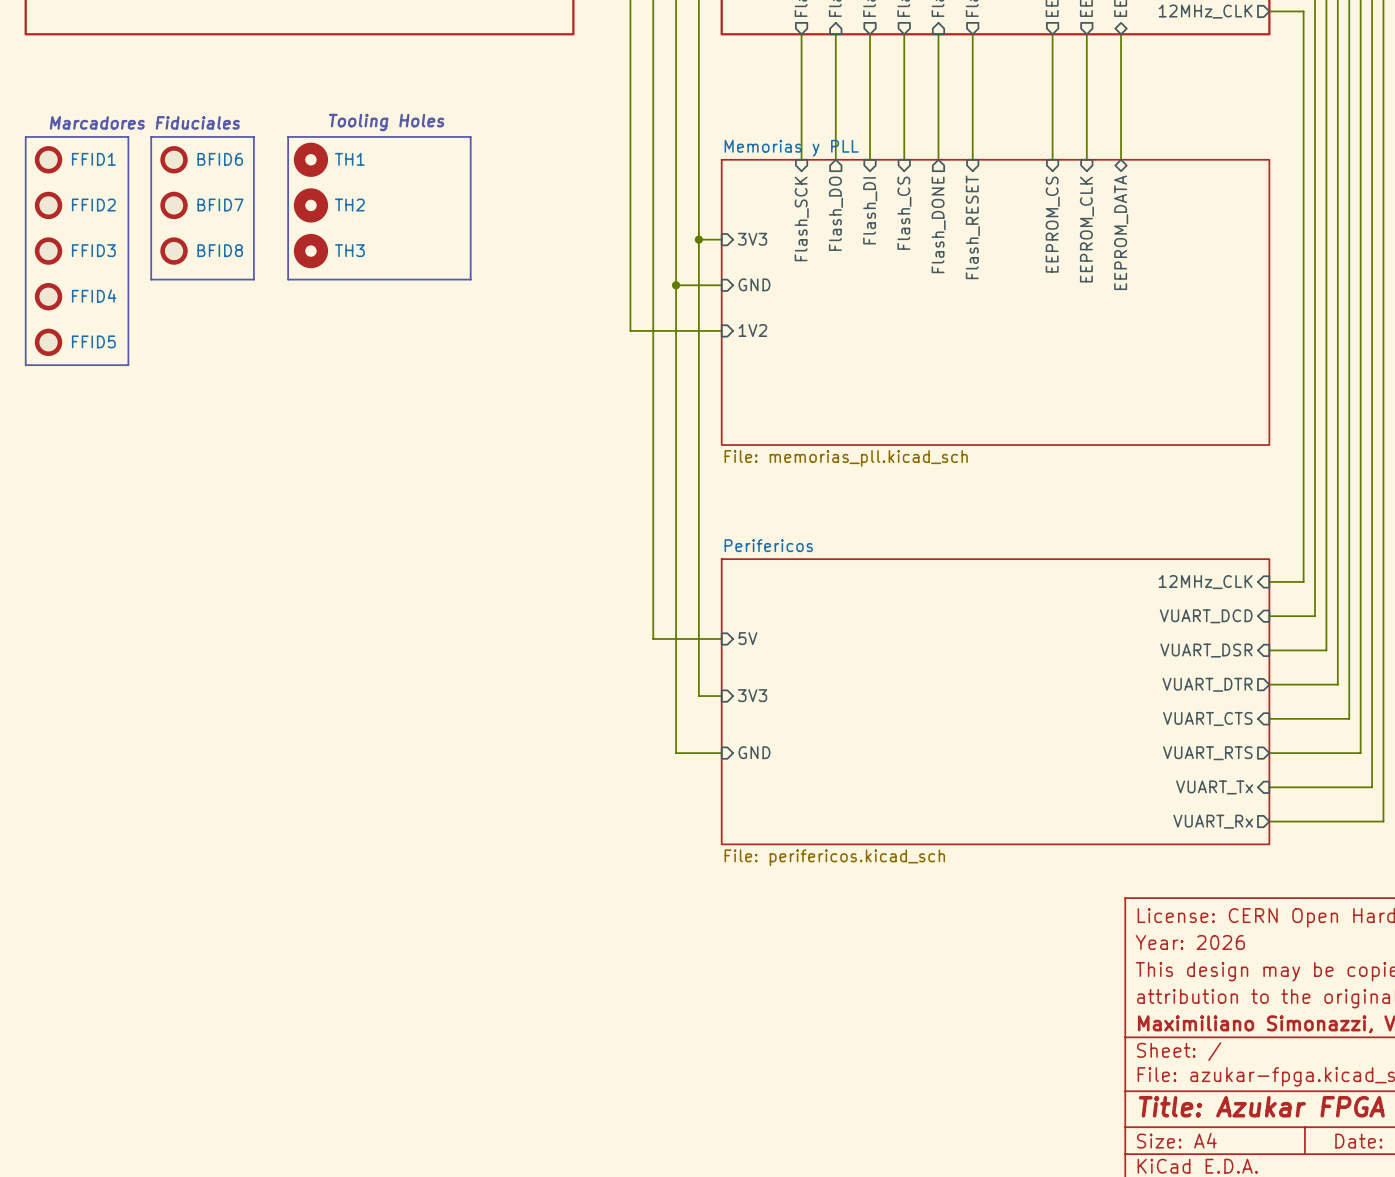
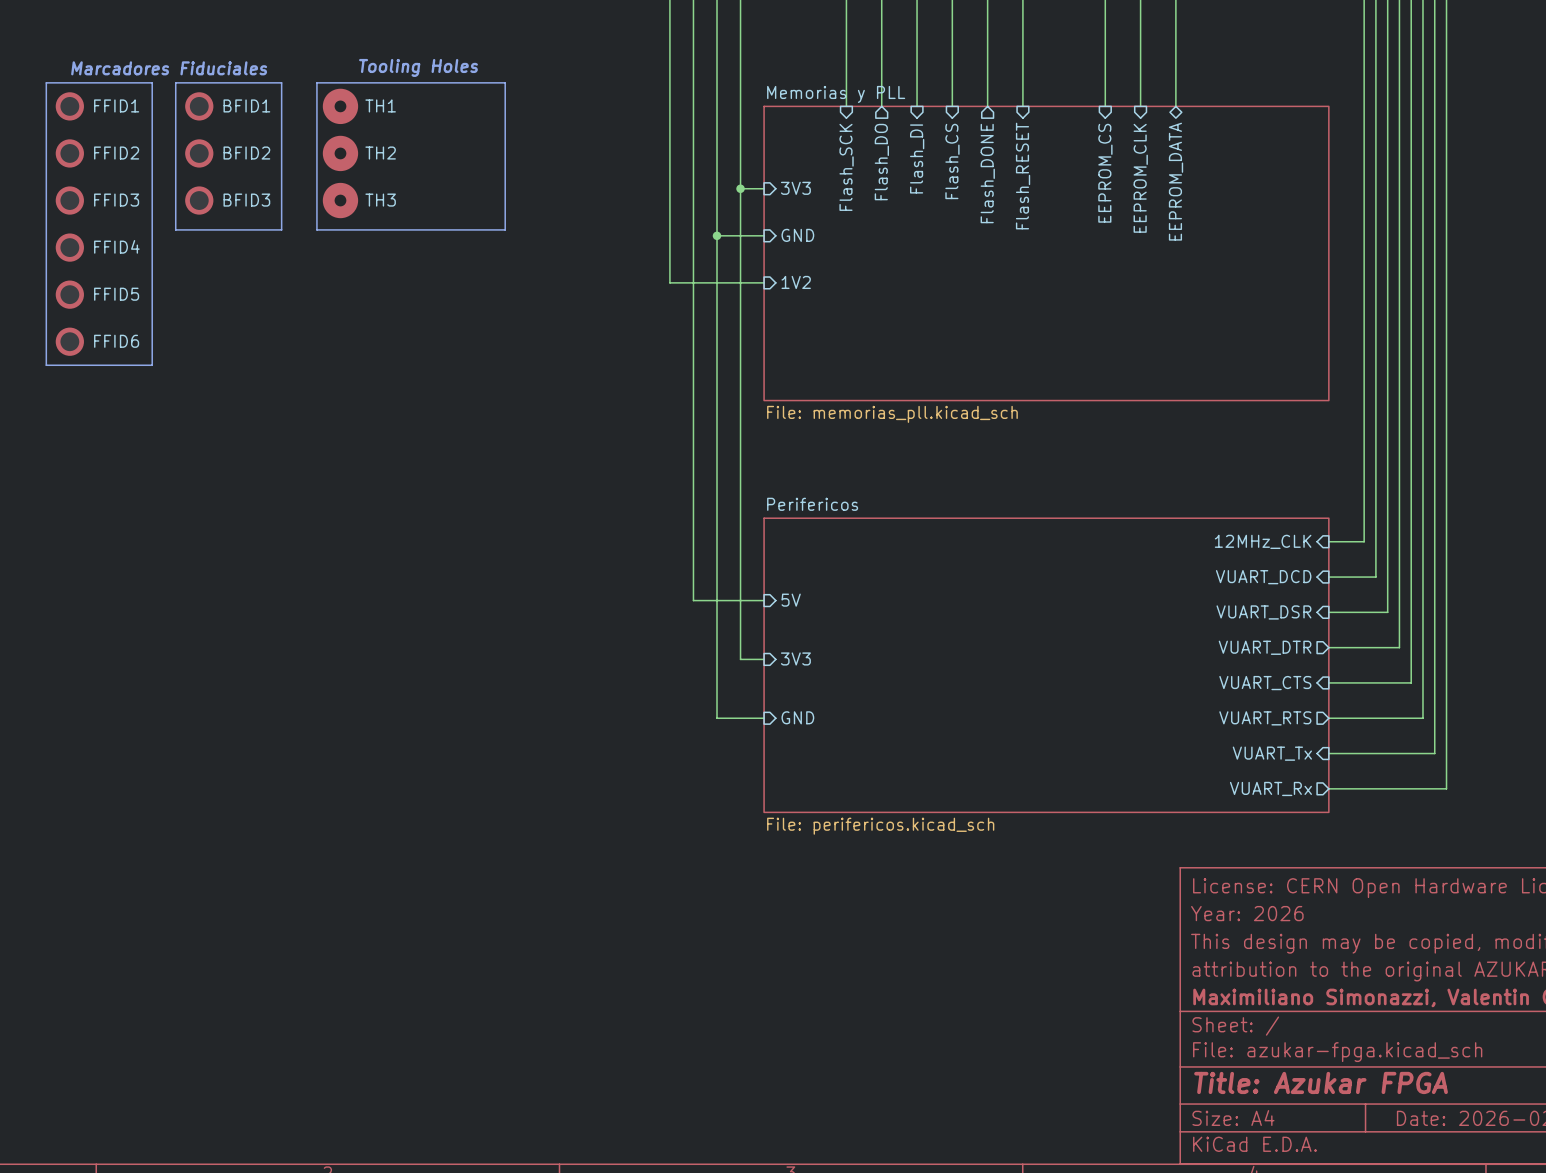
BFID6 name: BFID6 (220, 159) -> BFID1 (246, 105)
BFID7 name: BFID7 (220, 205) -> BFID2 (246, 153)
BFID8 name: BFID8 (220, 250) -> BFID3 (246, 200)
line: (25, 365) (128, 365) -> (46, 318) (46, 365) (152, 365) (152, 318)
FFID6: none -> (69, 341)

